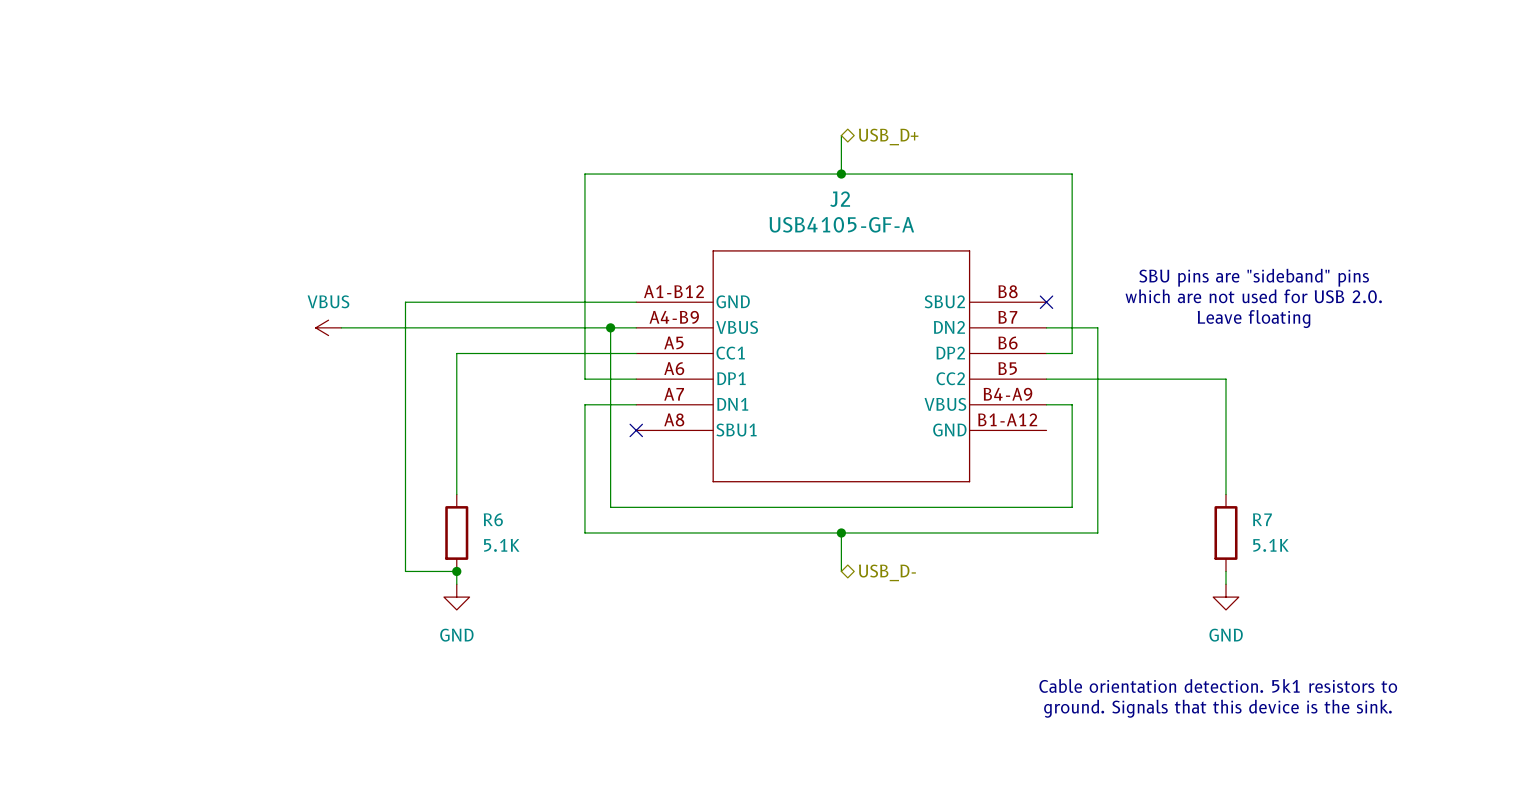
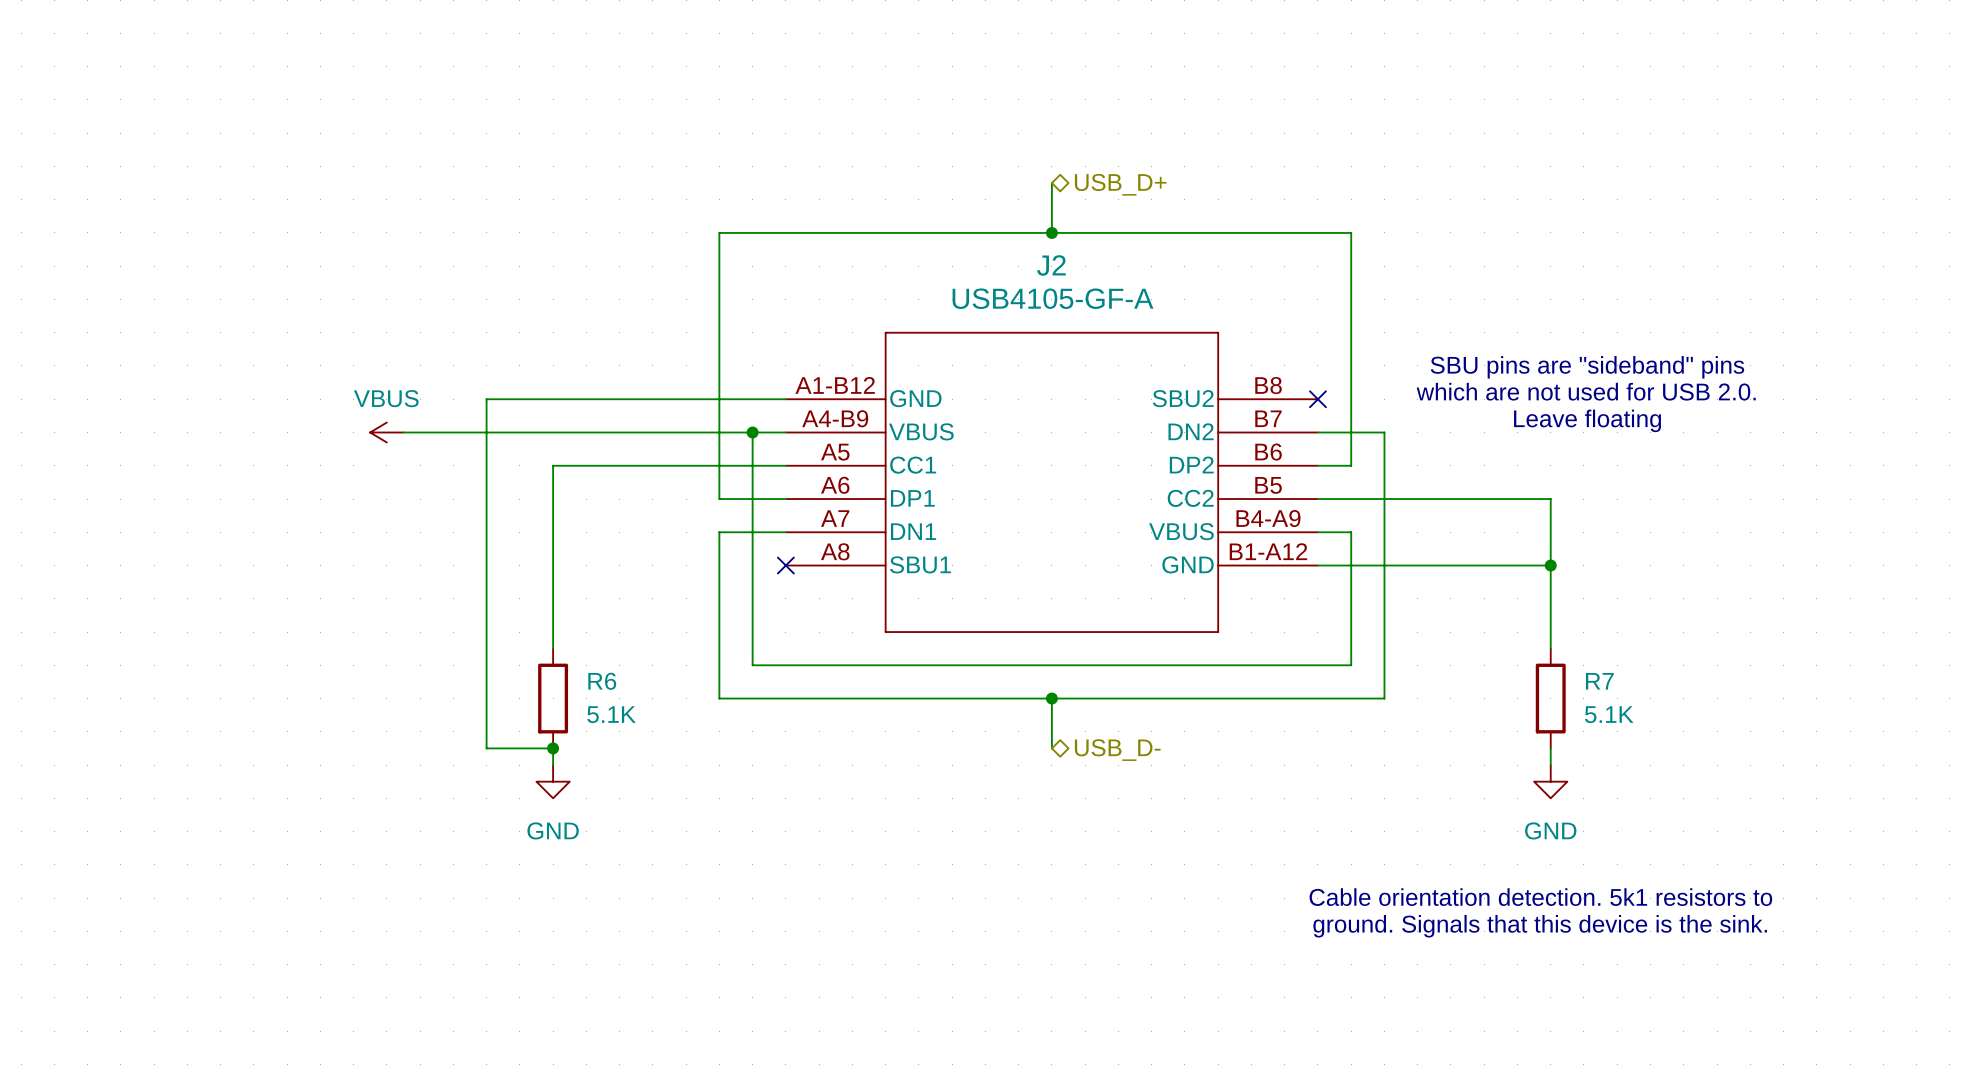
wire: none -> (1317, 565) (1550, 565)
junction: none -> (1550, 565)

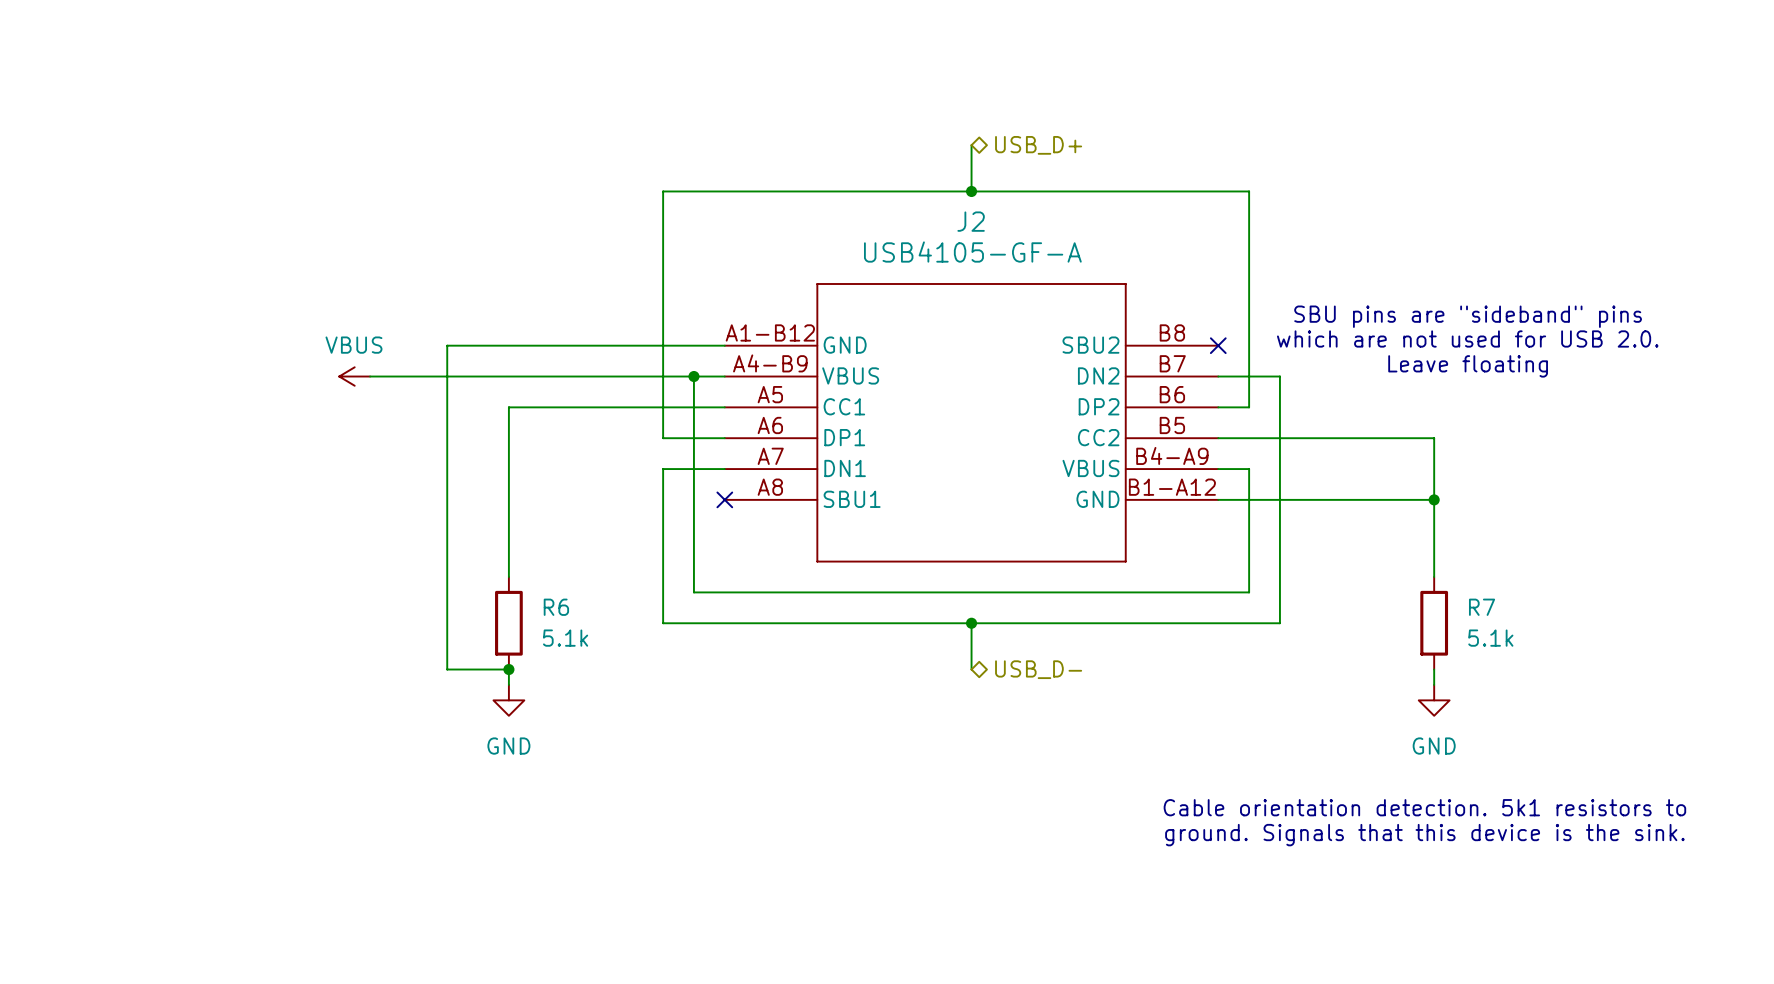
R6 value: 5.1K (611, 714) -> 5.1k (565, 638)
R7 value: 5.1K (1609, 714) -> 5.1k (1490, 638)

